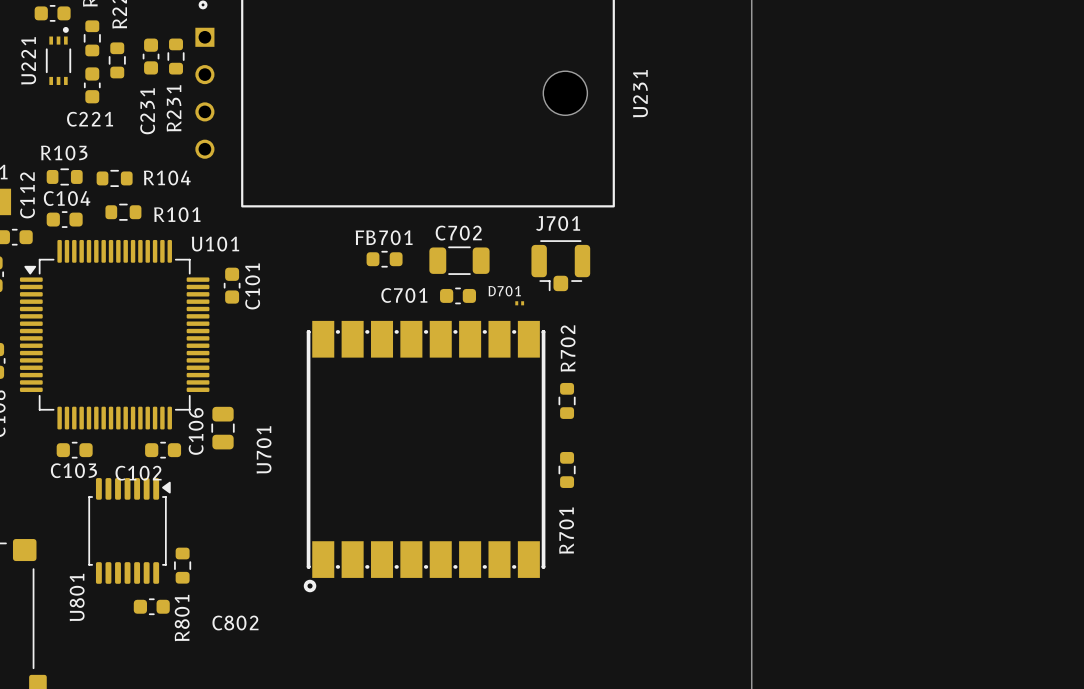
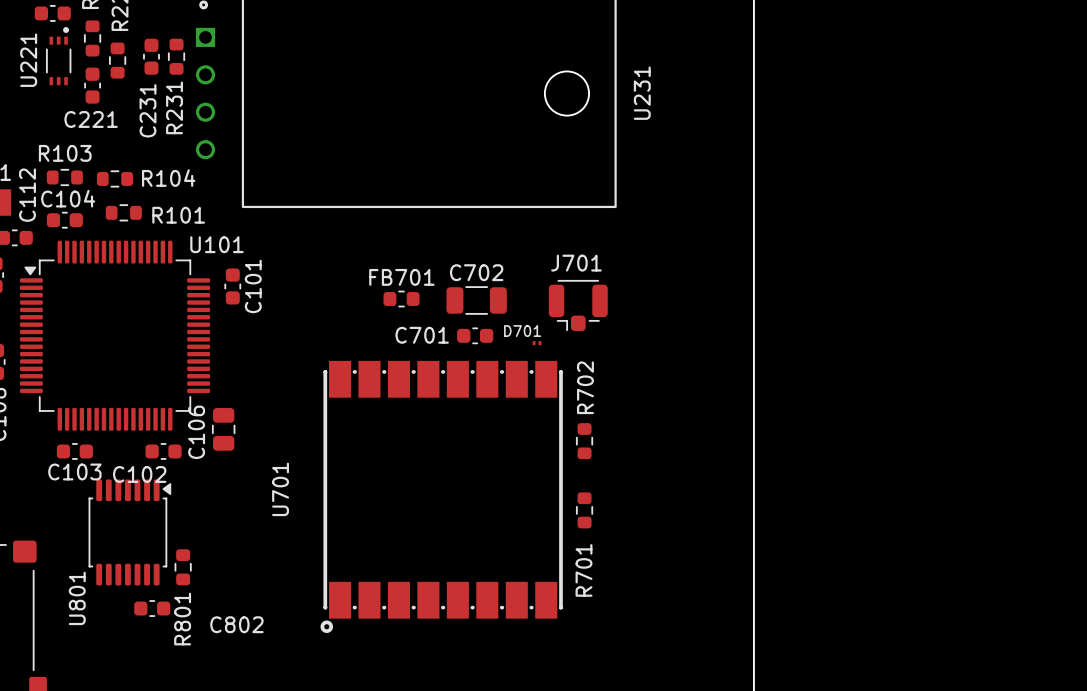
FB701 position: (384, 259) -> (401, 299)
C702 position: (459, 260) -> (476, 300)
J701 position: (560, 265) -> (578, 305)
C701 position: (458, 295) -> (475, 335)
D701 position: (519, 303) -> (537, 343)
R702 position: (567, 400) -> (584, 441)
U701 position: (424, 456) -> (441, 496)
R701 position: (567, 469) -> (584, 510)

